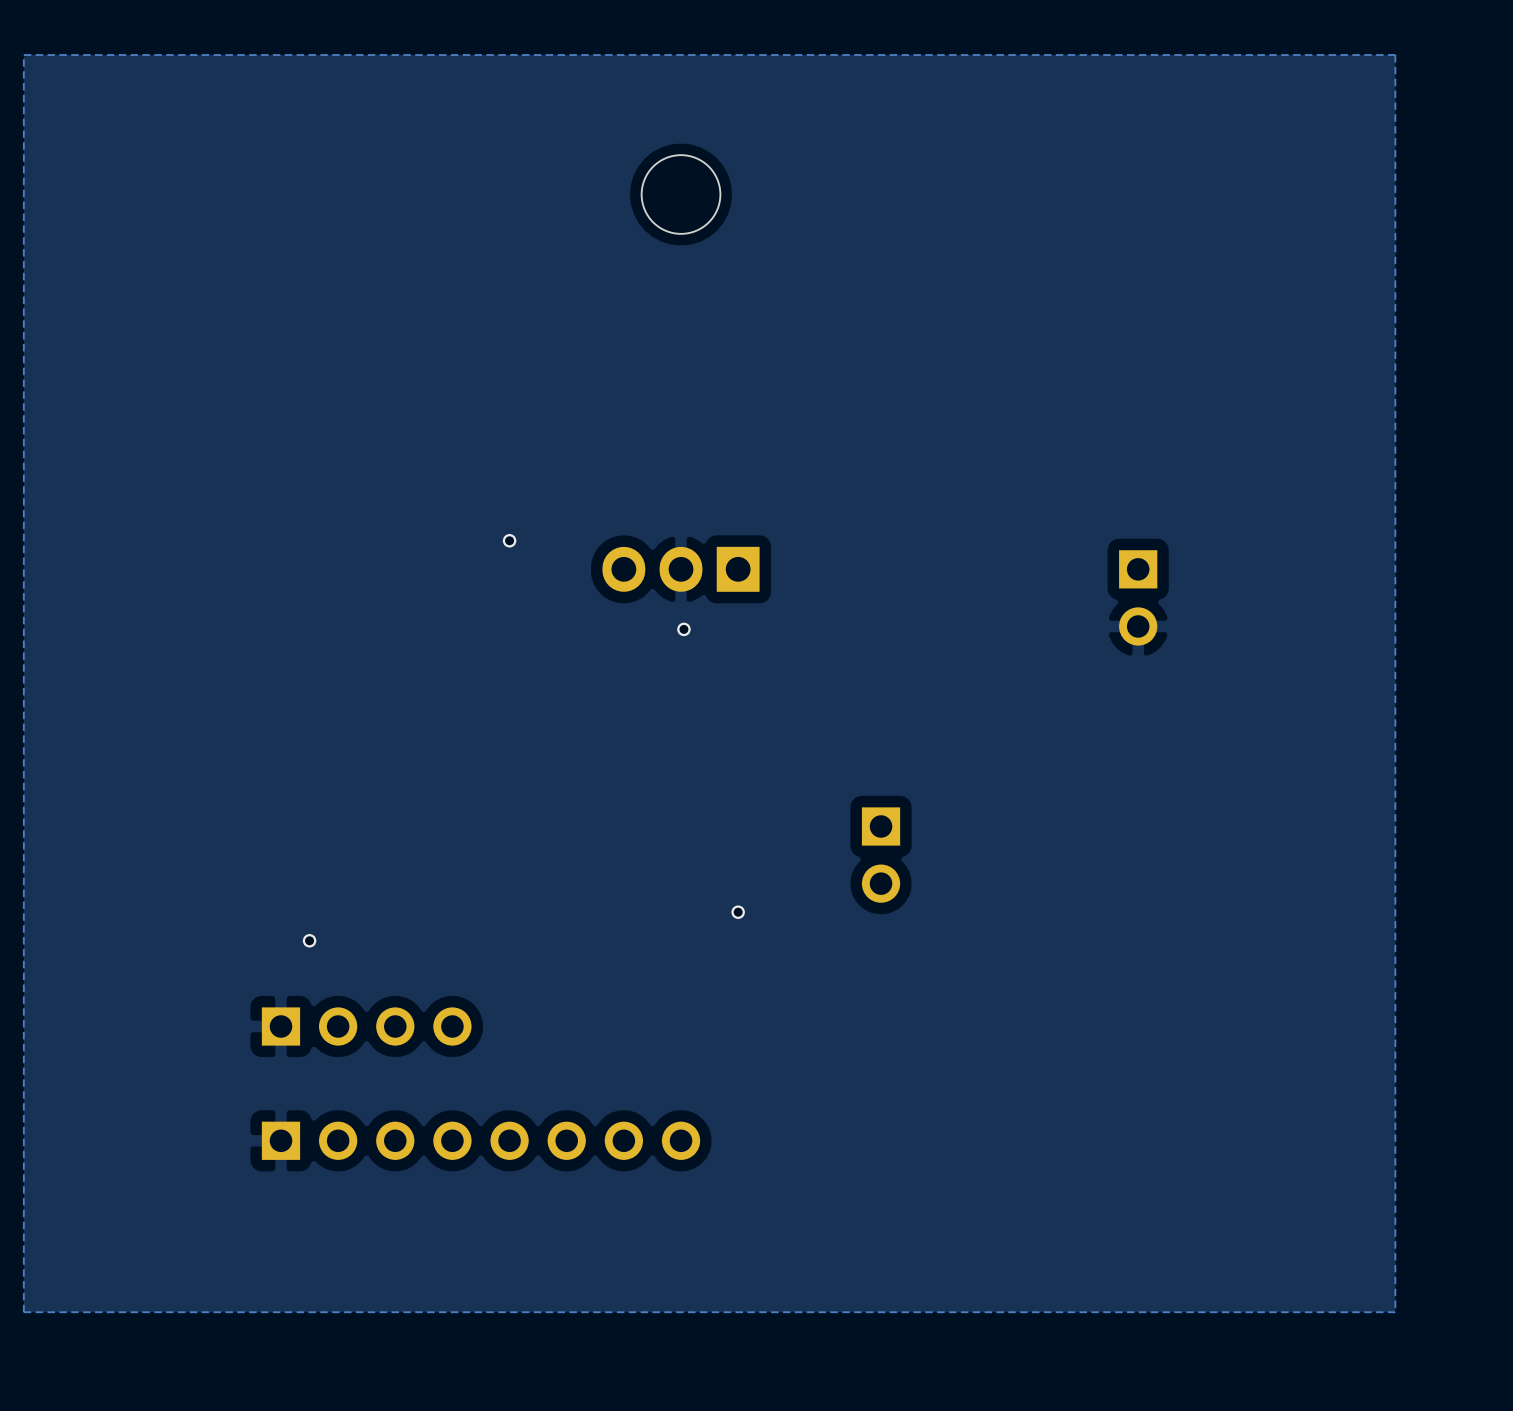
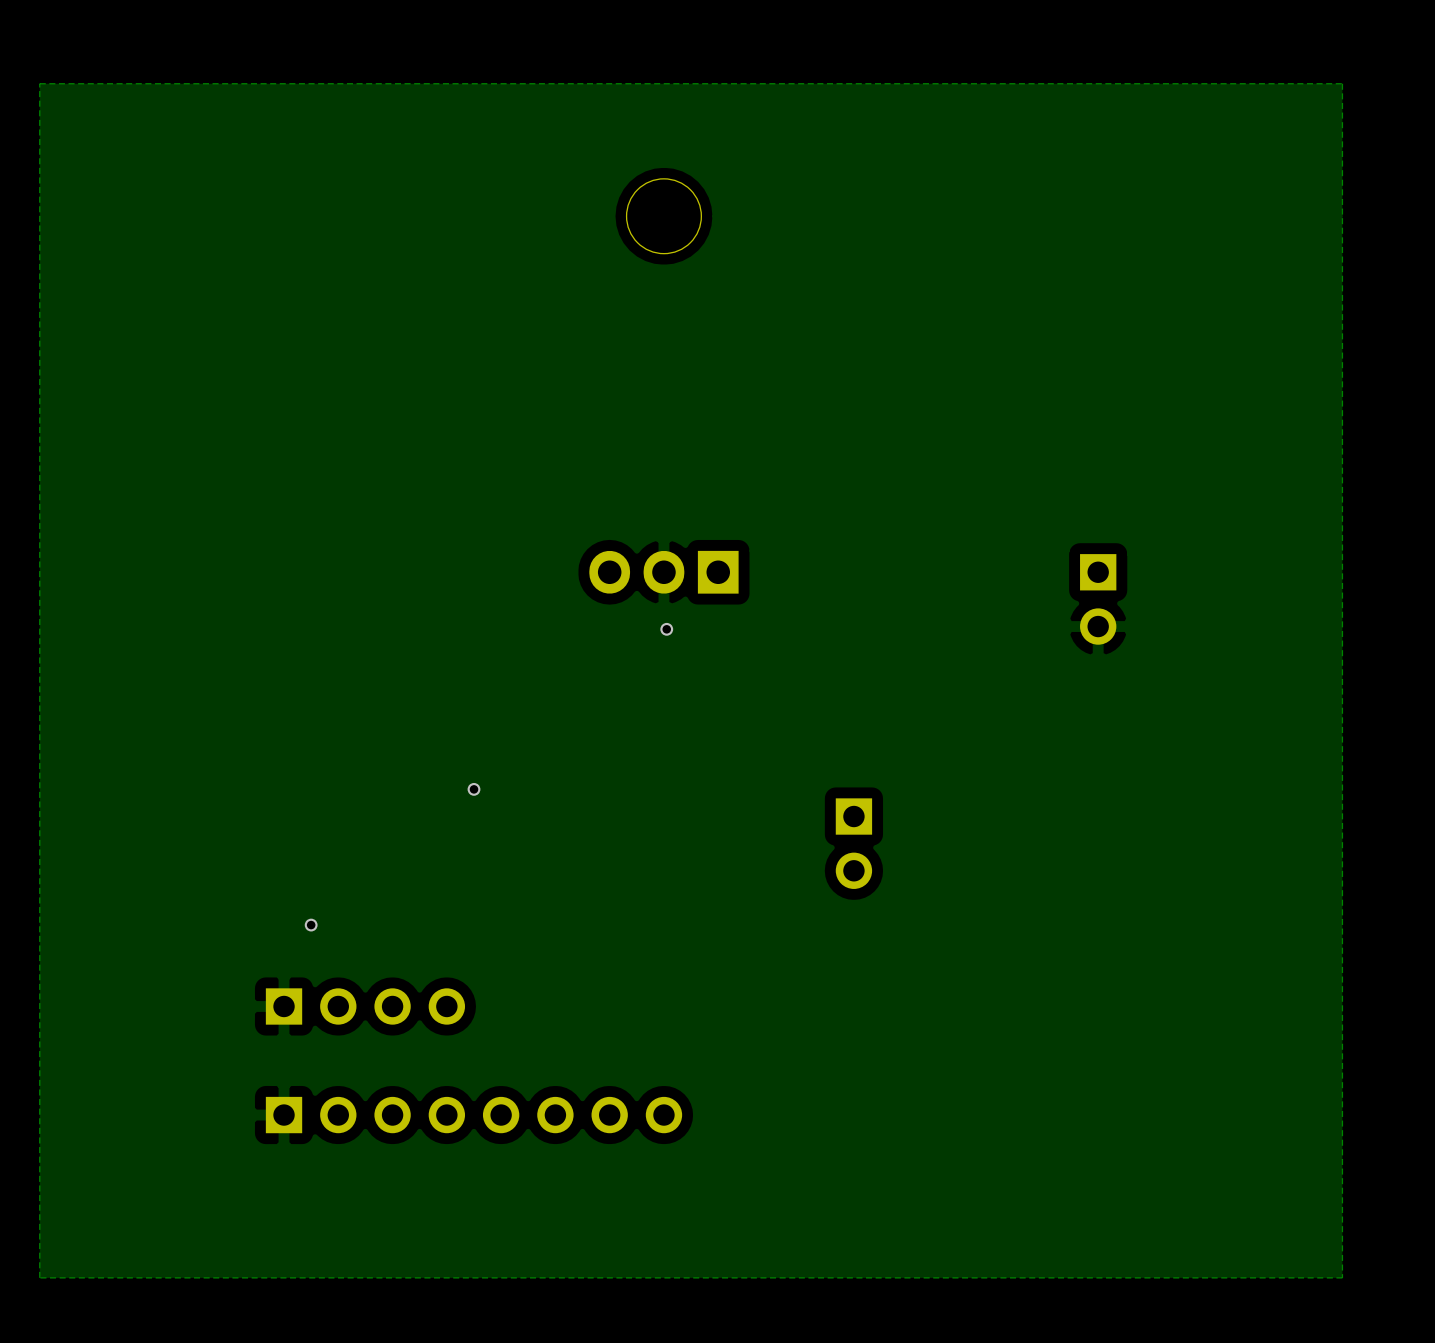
via: (509, 540) -> none
via: none -> (473, 789)
via: (738, 912) -> none

